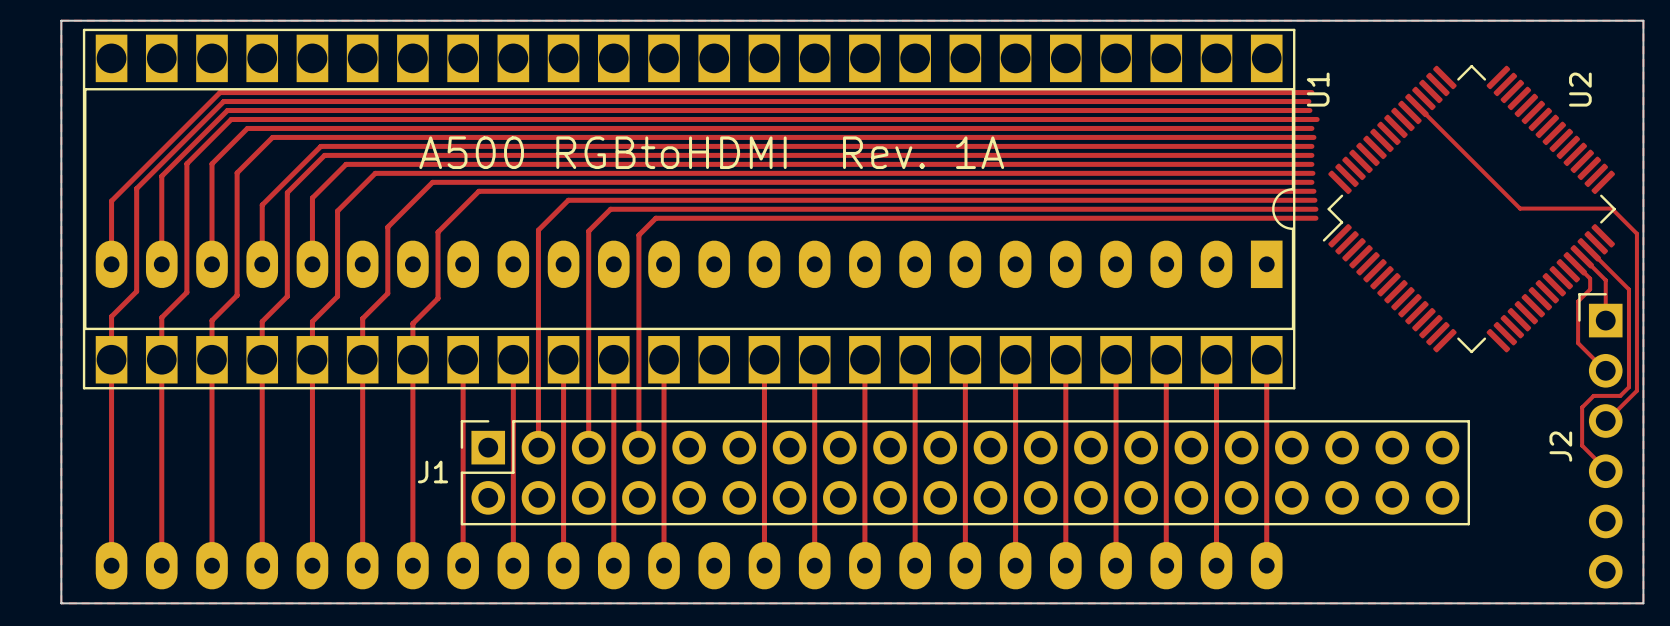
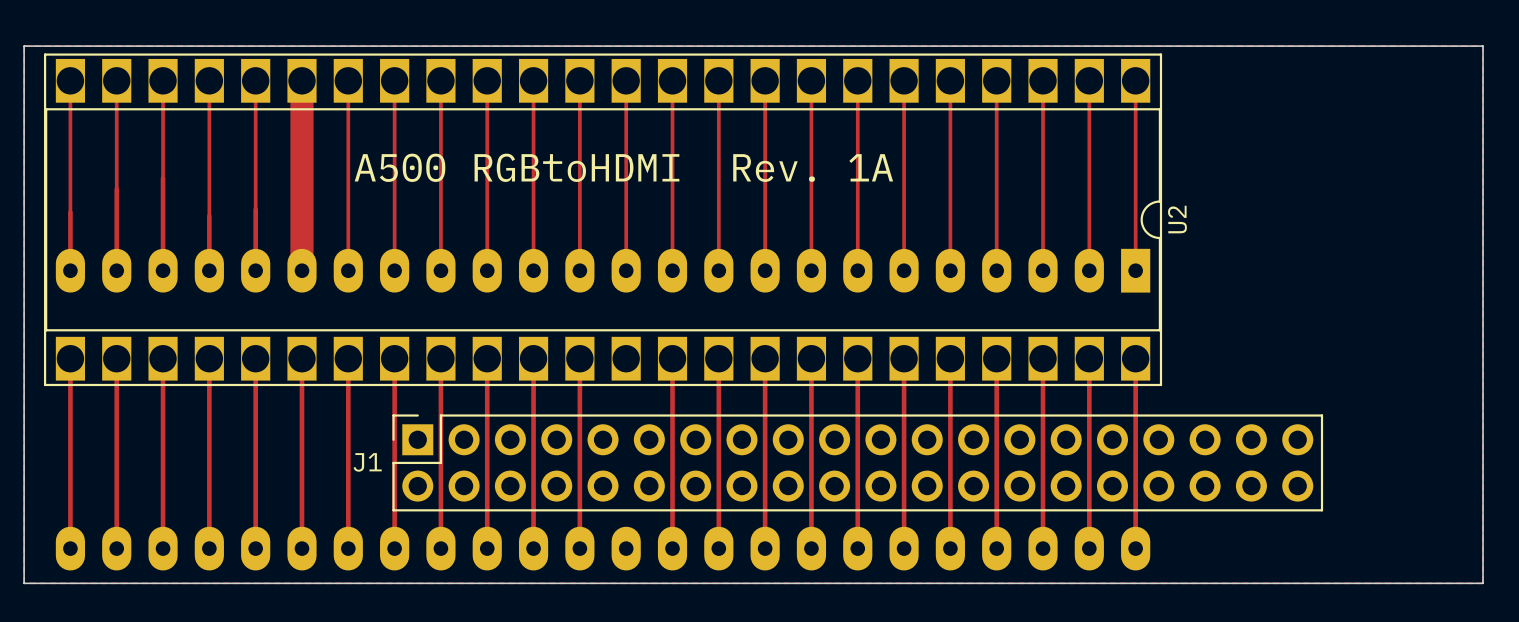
track: none -> (301, 80) (301, 270)
track: none -> (348, 80) (348, 270)
track: none -> (394, 80) (394, 270)
track: none -> (440, 80) (440, 270)
track: none -> (487, 80) (487, 270)
track: none -> (533, 80) (533, 270)
track: none -> (579, 80) (579, 270)
track: none -> (626, 80) (626, 270)
track: none -> (672, 80) (672, 270)
track: none -> (718, 80) (718, 270)
track: none -> (765, 80) (765, 270)
track: none -> (811, 80) (811, 270)
track: none -> (857, 80) (857, 270)
track: none -> (904, 80) (904, 270)
track: none -> (950, 80) (950, 270)
track: none -> (996, 80) (996, 270)
track: none -> (1043, 80) (1043, 270)
track: none -> (1089, 80) (1089, 270)
track: none -> (1135, 80) (1135, 270)
U1 name: U1 (1318, 89) -> U2 (1177, 219)
track: (1311, 92) (220, 92) (111, 201) -> (70, 80) (70, 212)
track: (1308, 101) (223, 101) (136, 188) (136, 291) (111, 316) (111, 359) -> none
track: (1416, 105) (1520, 208) (1611, 208) (1636, 233) (1636, 390) (1606, 421) -> none
track: (1309, 110) (227, 110) (161, 176) -> (116, 80) (116, 189)
track: (1317, 119) (231, 119) (186, 163) (186, 292) (161, 317) (161, 359) -> none
track: (1311, 128) (247, 128) (212, 163) -> (163, 80) (163, 178)
track: (1313, 137) (272, 137) (237, 172) (237, 295) (212, 320) (212, 359) -> none
track: (1311, 146) (320, 146) (262, 205) -> (209, 80) (209, 216)
track: (1311, 155) (324, 155) (287, 192) (287, 296) (262, 321) (262, 359) -> none
track: (1311, 164) (346, 164) (312, 198) -> (255, 80) (255, 209)
track: (1312, 173) (375, 173) (337, 211) (337, 296) (312, 321) (312, 359) -> none
track: (1311, 182) (432, 182) (387, 227) (387, 293) (362, 318) (362, 359) -> none
track: (1313, 191) (478, 191) (438, 232) (438, 298) (412, 323) (412, 359) -> none
track: (1314, 200) (568, 200) (538, 230) (538, 447) -> none
track: (1315, 209) (610, 209) (588, 231) (588, 447) -> none
U2: (1469, 209) -> none
track: (1315, 218) (655, 218) (638, 235) (638, 447) -> none
track: (1589, 249) (1628, 289) (1628, 387) (1620, 395) (1593, 395) (1582, 407) (1582, 445) (1607, 471) -> none
track: (1582, 256) (1605, 280) (1605, 320) -> none
track: (1575, 263) (1590, 278) (1590, 289) (1578, 301) (1578, 343) (1605, 370) -> none
J2: (1600, 440) -> none

